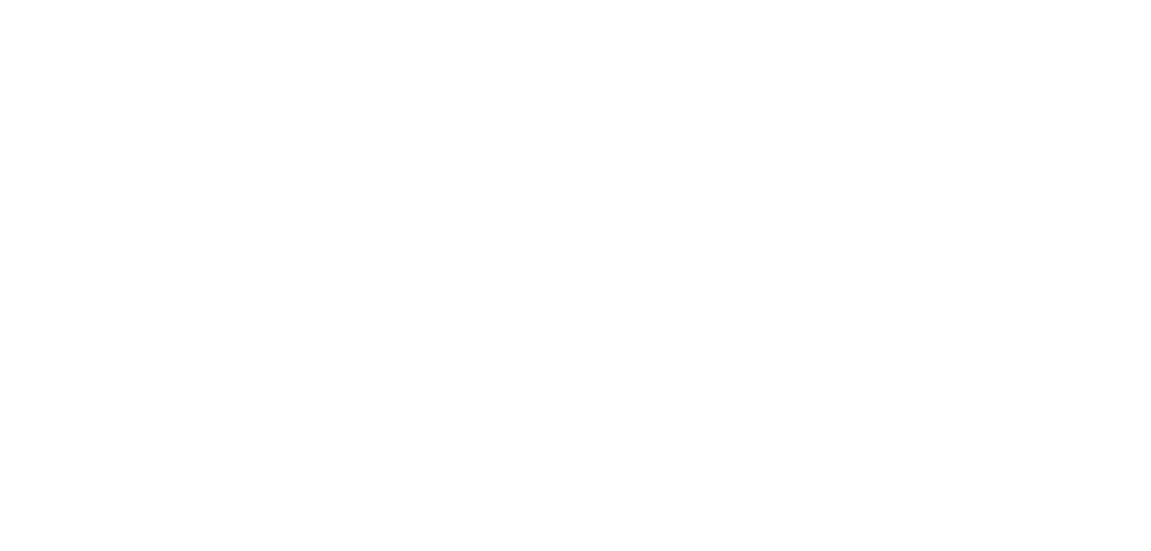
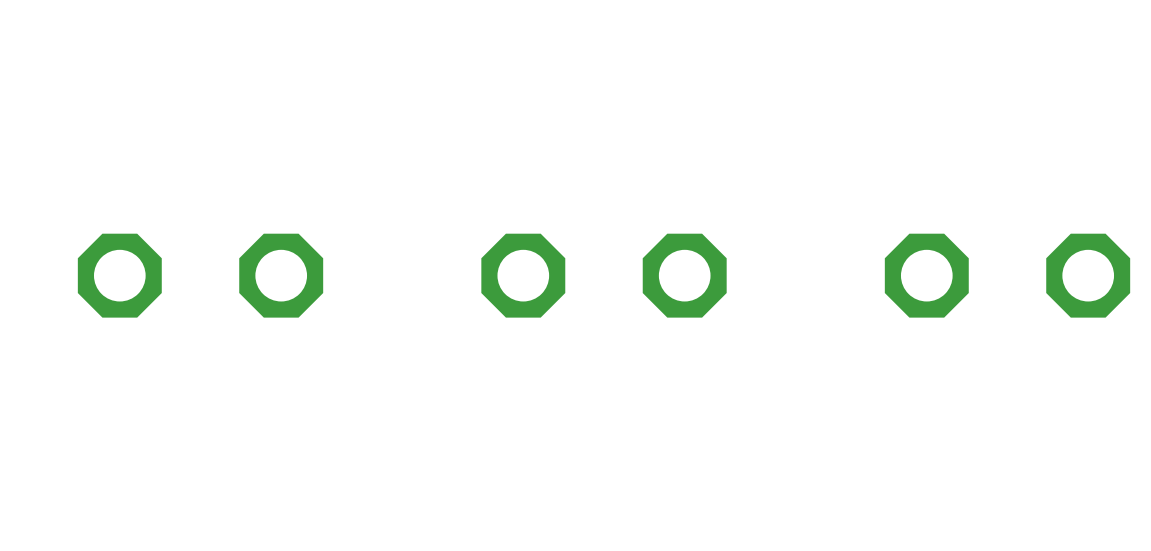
part: none -> (200, 275)
part: none -> (604, 275)
part: none -> (1007, 275)

